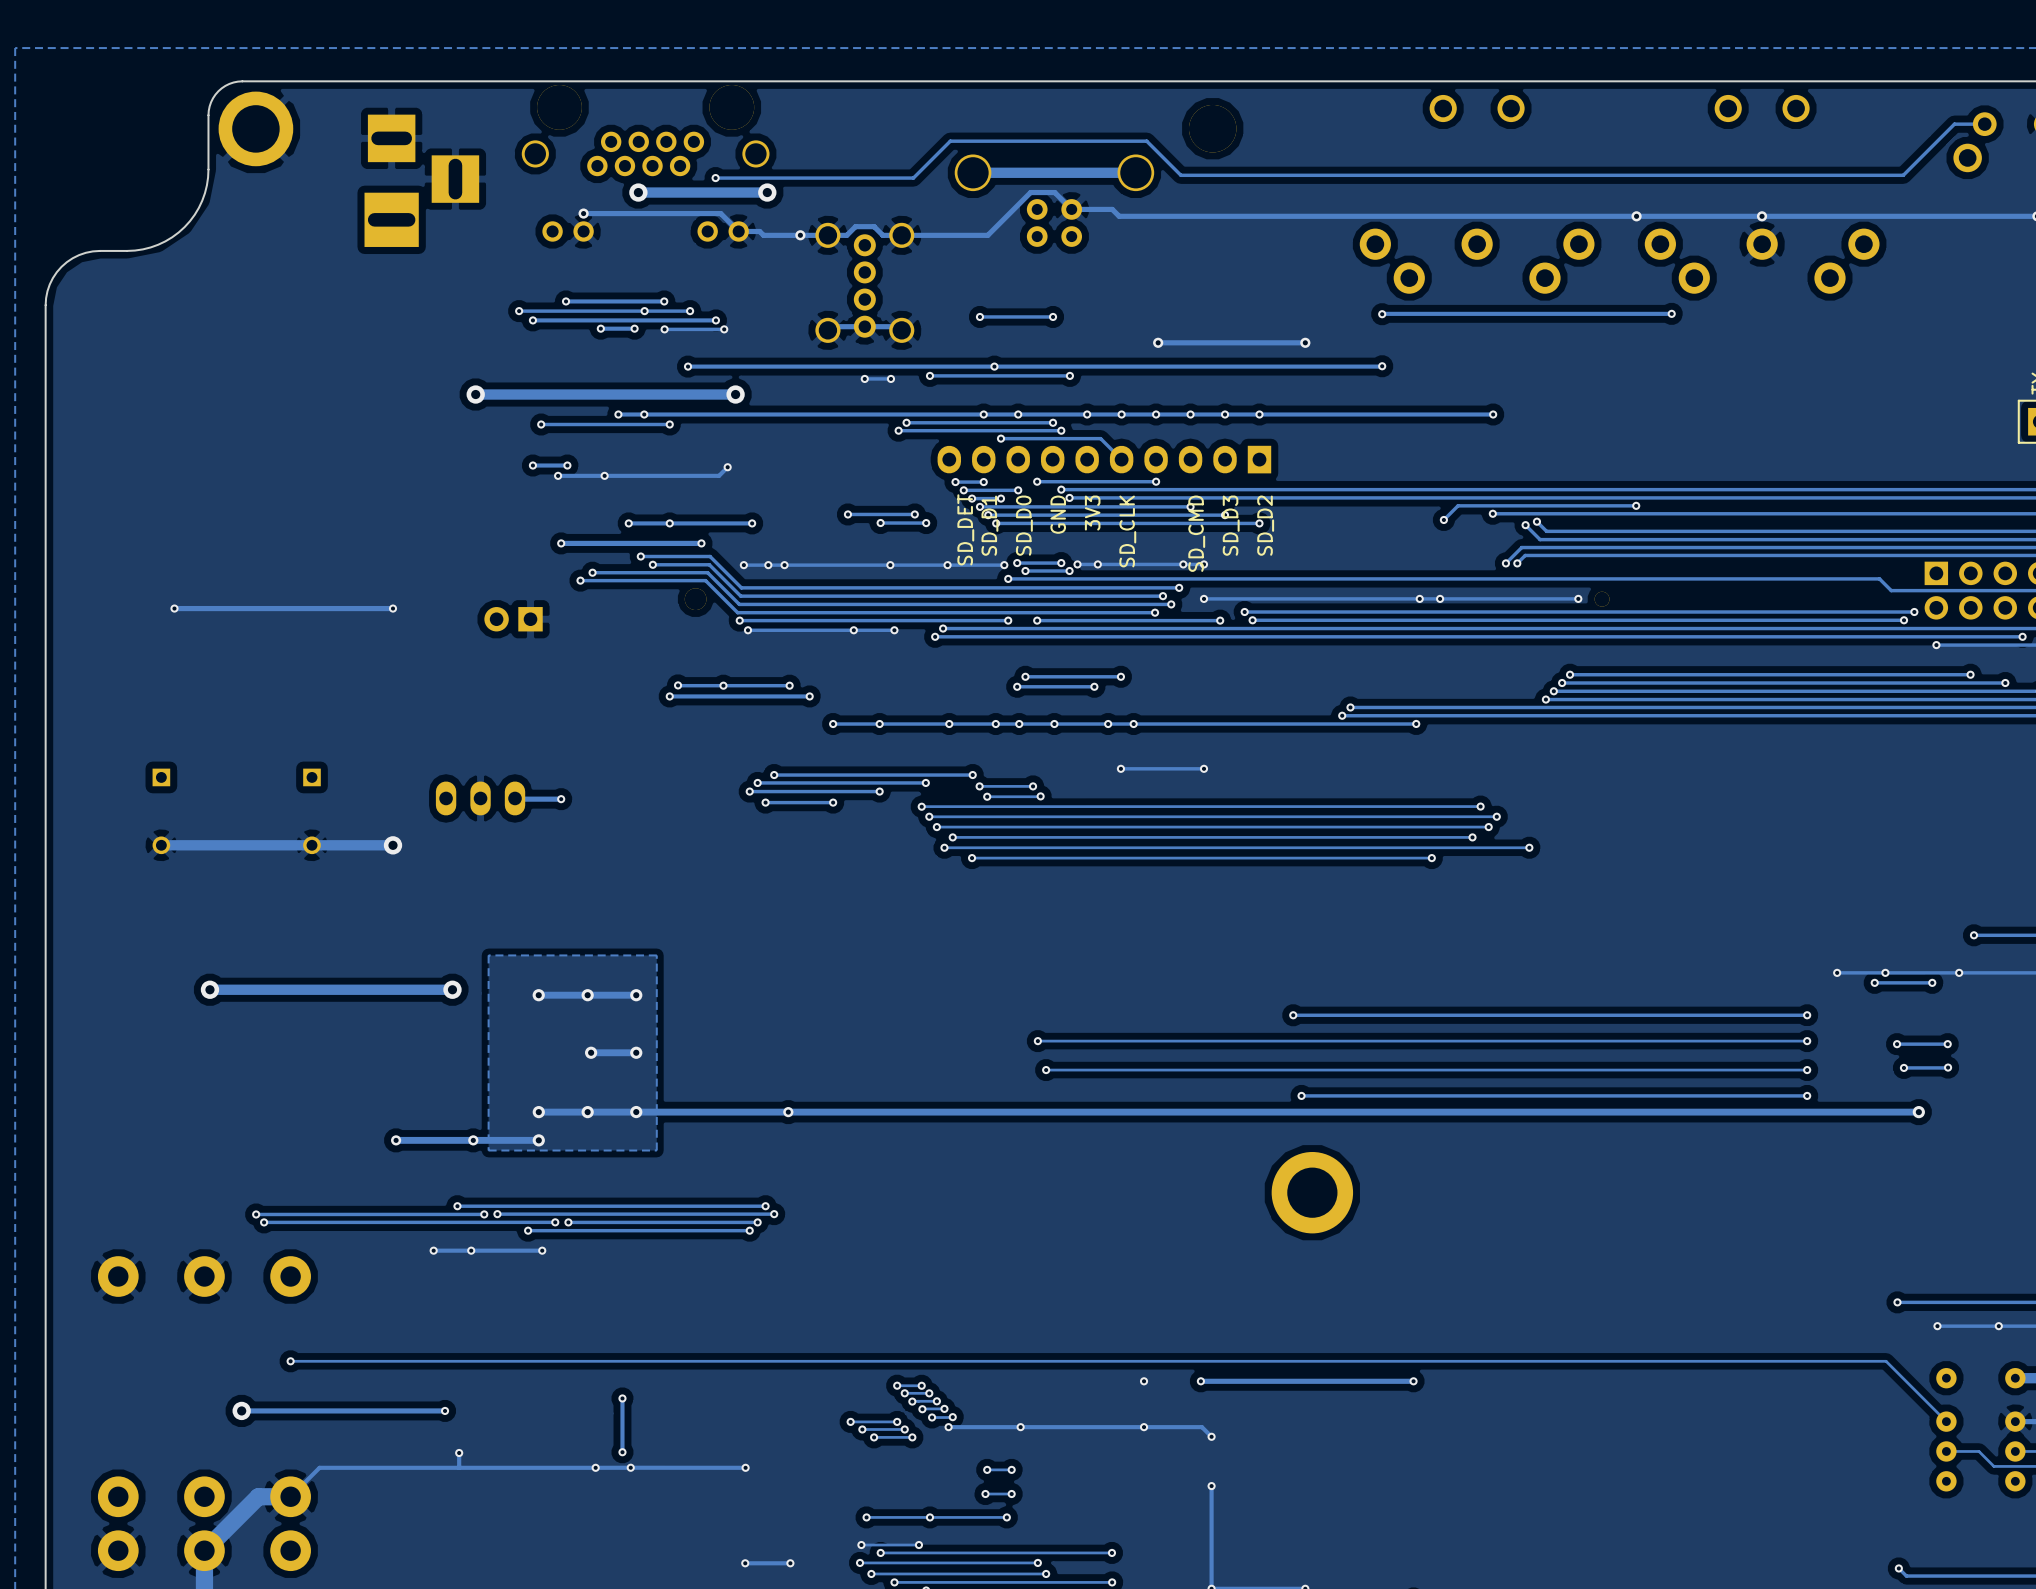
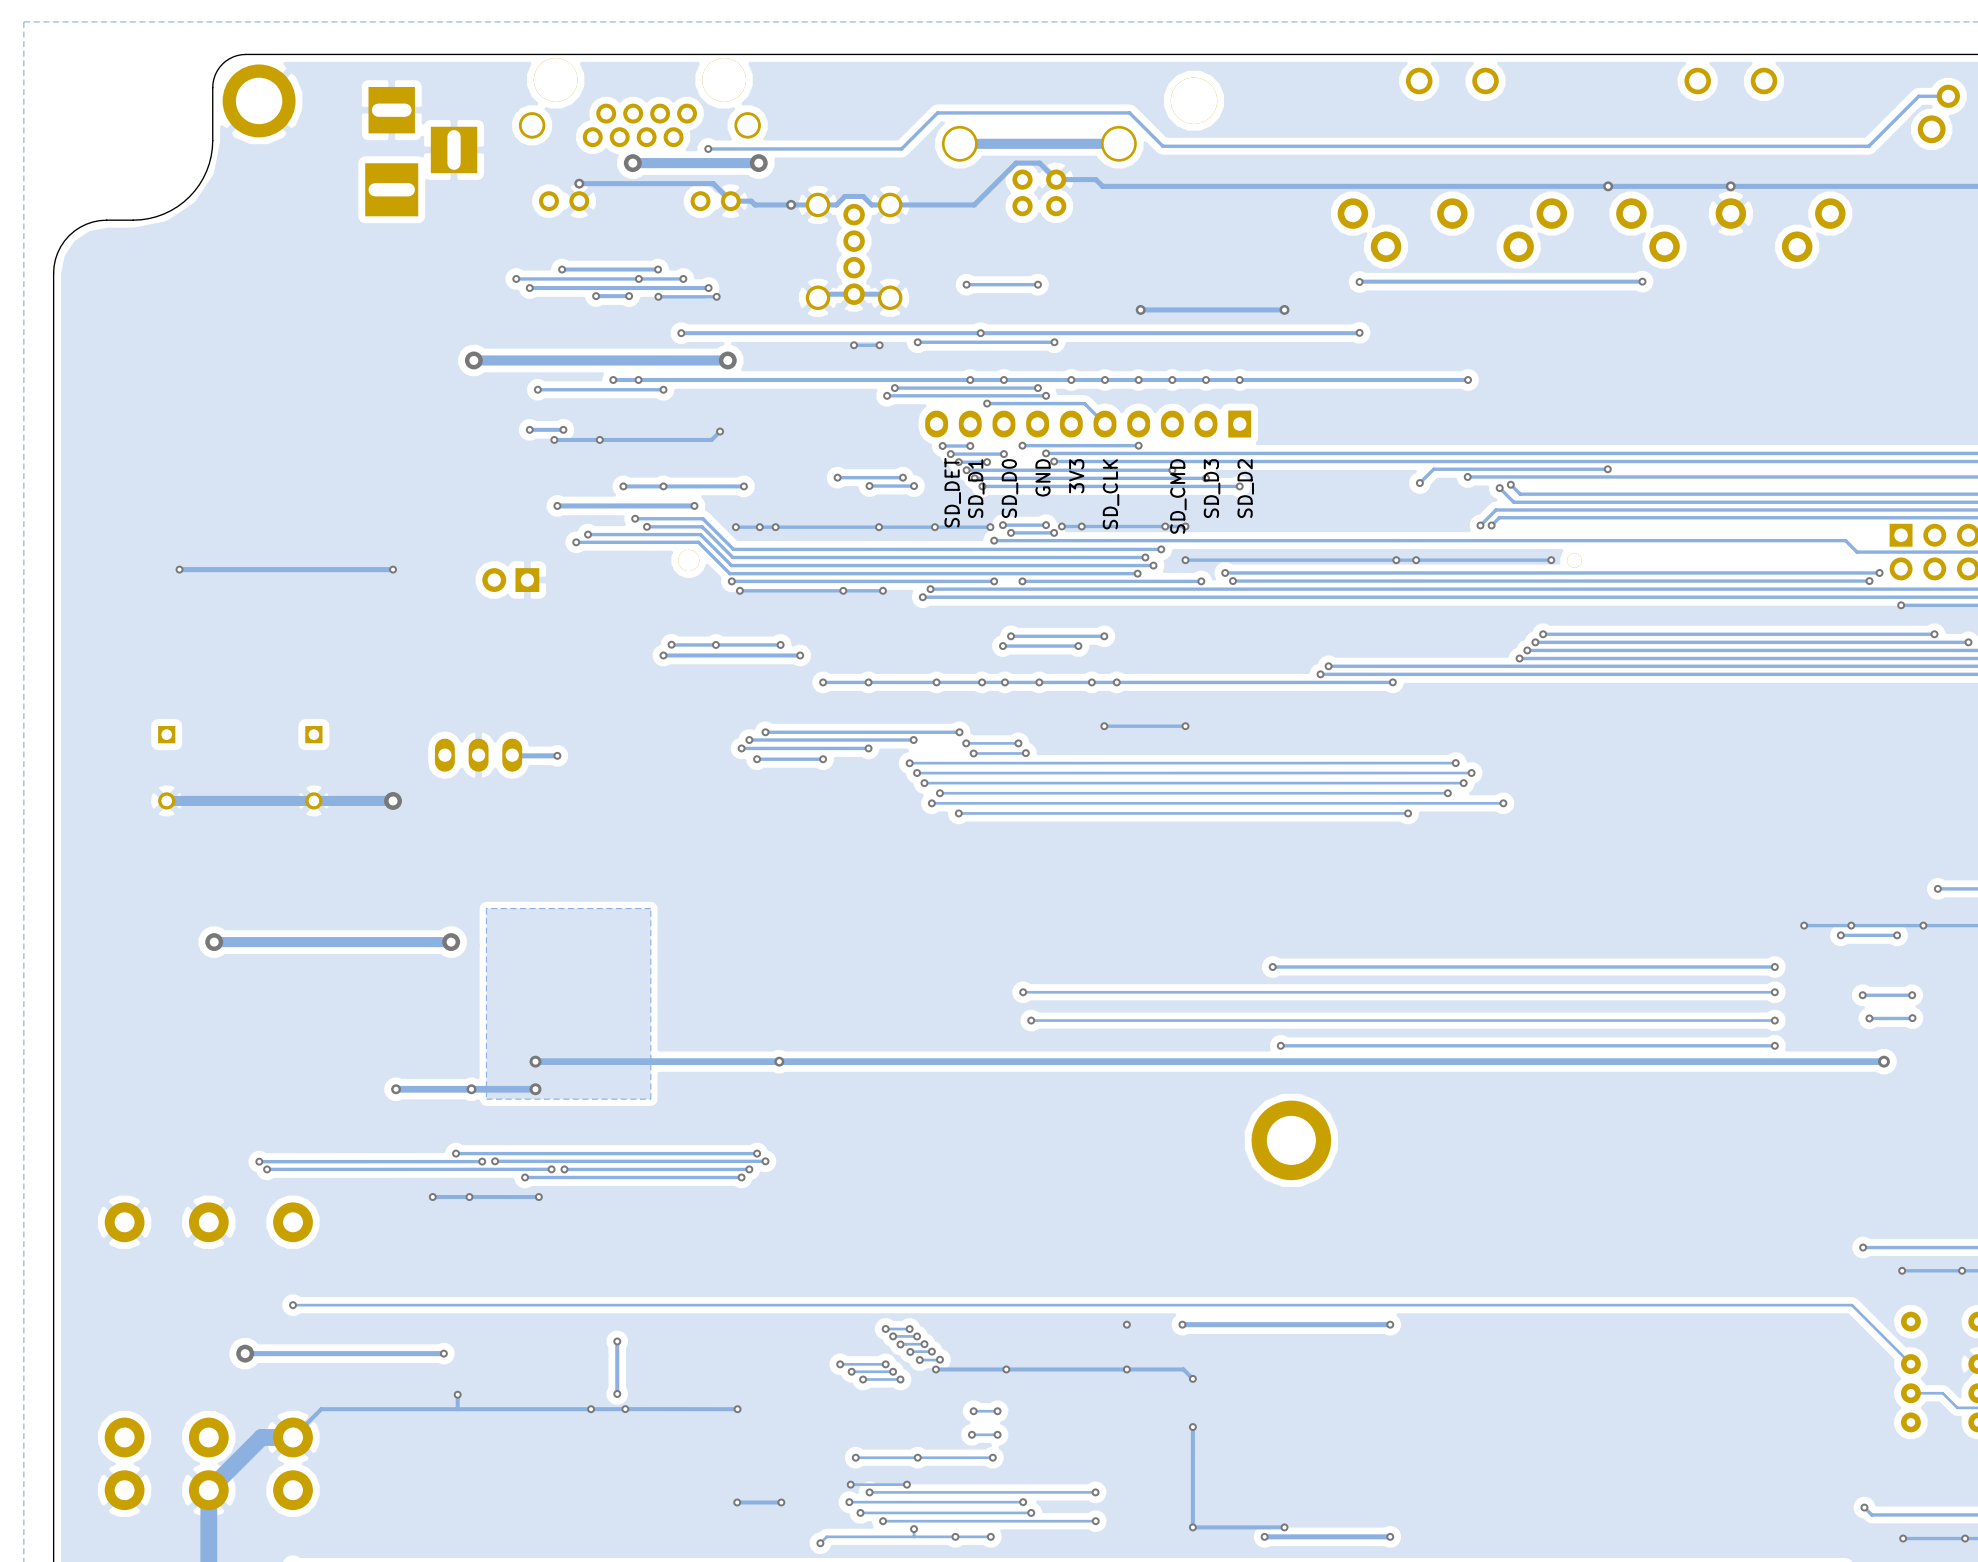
via: (538, 995) -> none
via: (587, 995) -> none
track: (636, 995) (538, 995) -> none
via: (636, 995) -> none
via: (591, 1052) -> none
track: (636, 1052) (591, 1052) -> none
via: (636, 1052) -> none
via: (587, 1112) -> none
via: (636, 1112) -> none

